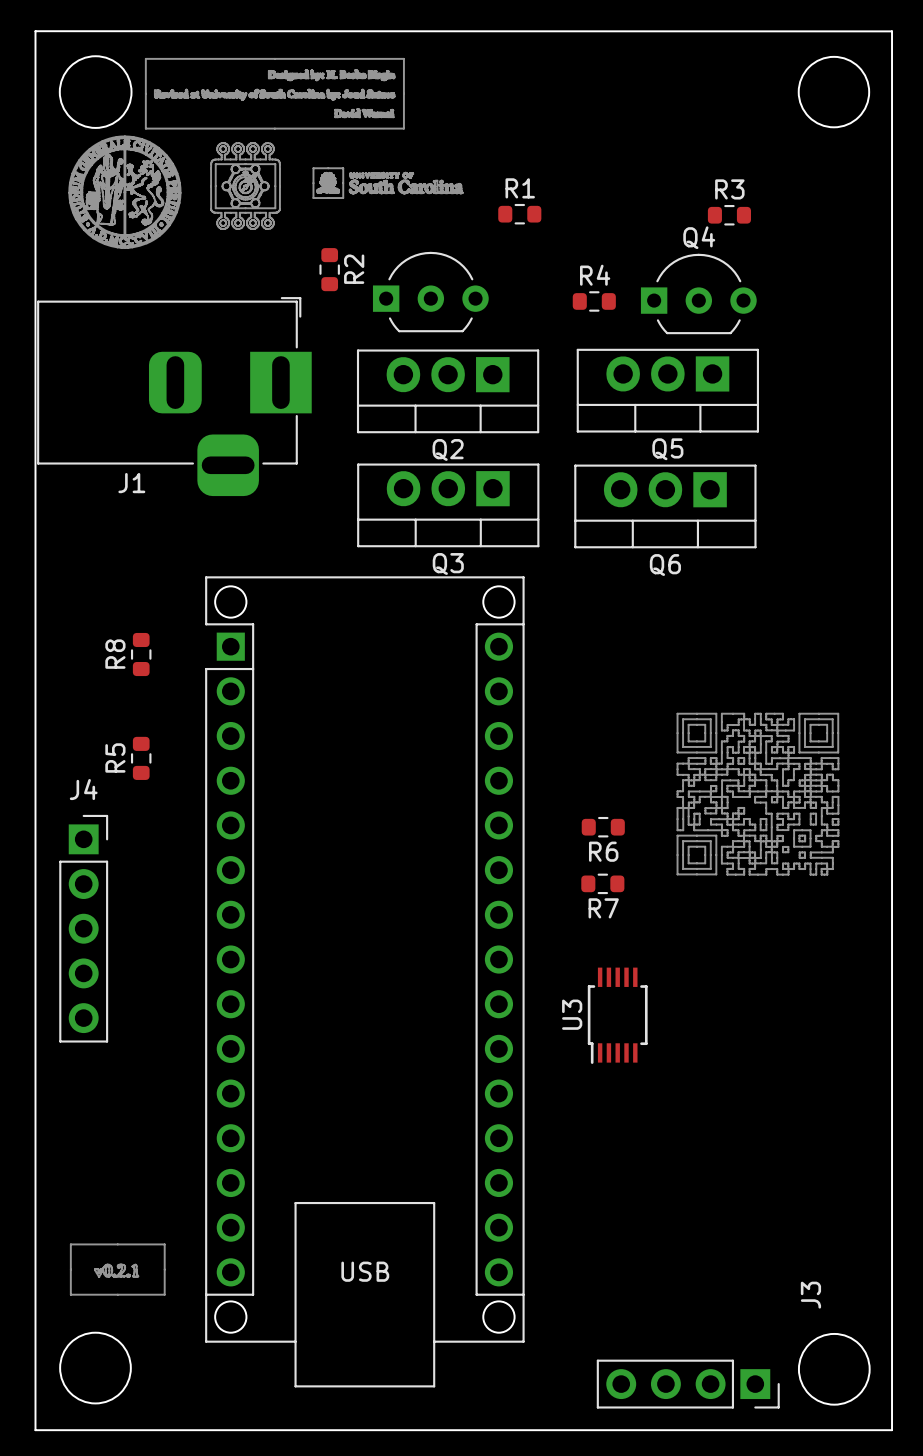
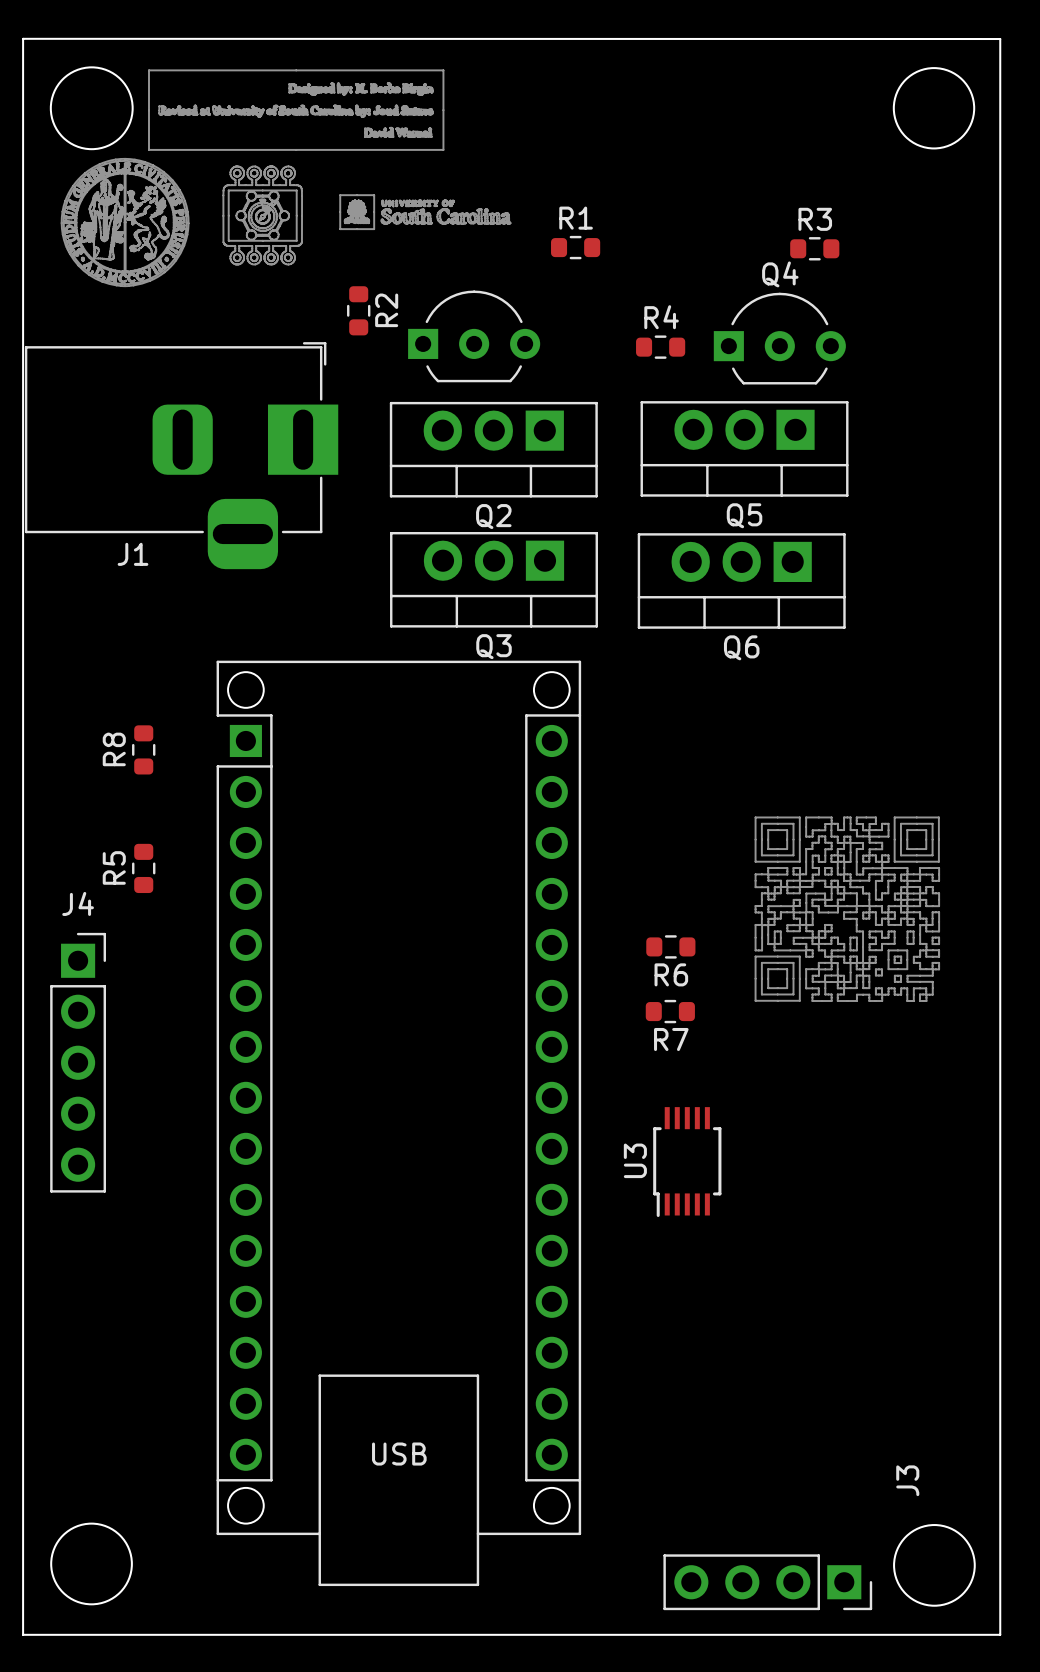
line: (70, 1244) (164, 1244) (164, 1294) (70, 1294) (70, 1244) -> none
line: (107, 1264) (100, 1269) (99, 1272) (98, 1269) (95, 1269) (99, 1277) (102, 1270) (106, 1276) (111, 1274) (111, 1267) (107, 1264) -> none
line: (121, 1264) (125, 1267) (120, 1274) (124, 1276) (116, 1276) (121, 1269) (121, 1265) (119, 1267) (117, 1266) (121, 1264) -> none
line: (135, 1264) (132, 1266) (134, 1270) (133, 1276) (138, 1276) (135, 1264) -> none
line: (107, 1265) (105, 1270) (107, 1275) (109, 1270) (107, 1265) -> none
line: (113, 1274) (113, 1276) (114, 1276) (115, 1275) (113, 1274) -> none
line: (127, 1274) (127, 1276) (129, 1276) (129, 1274) (127, 1274) -> none

